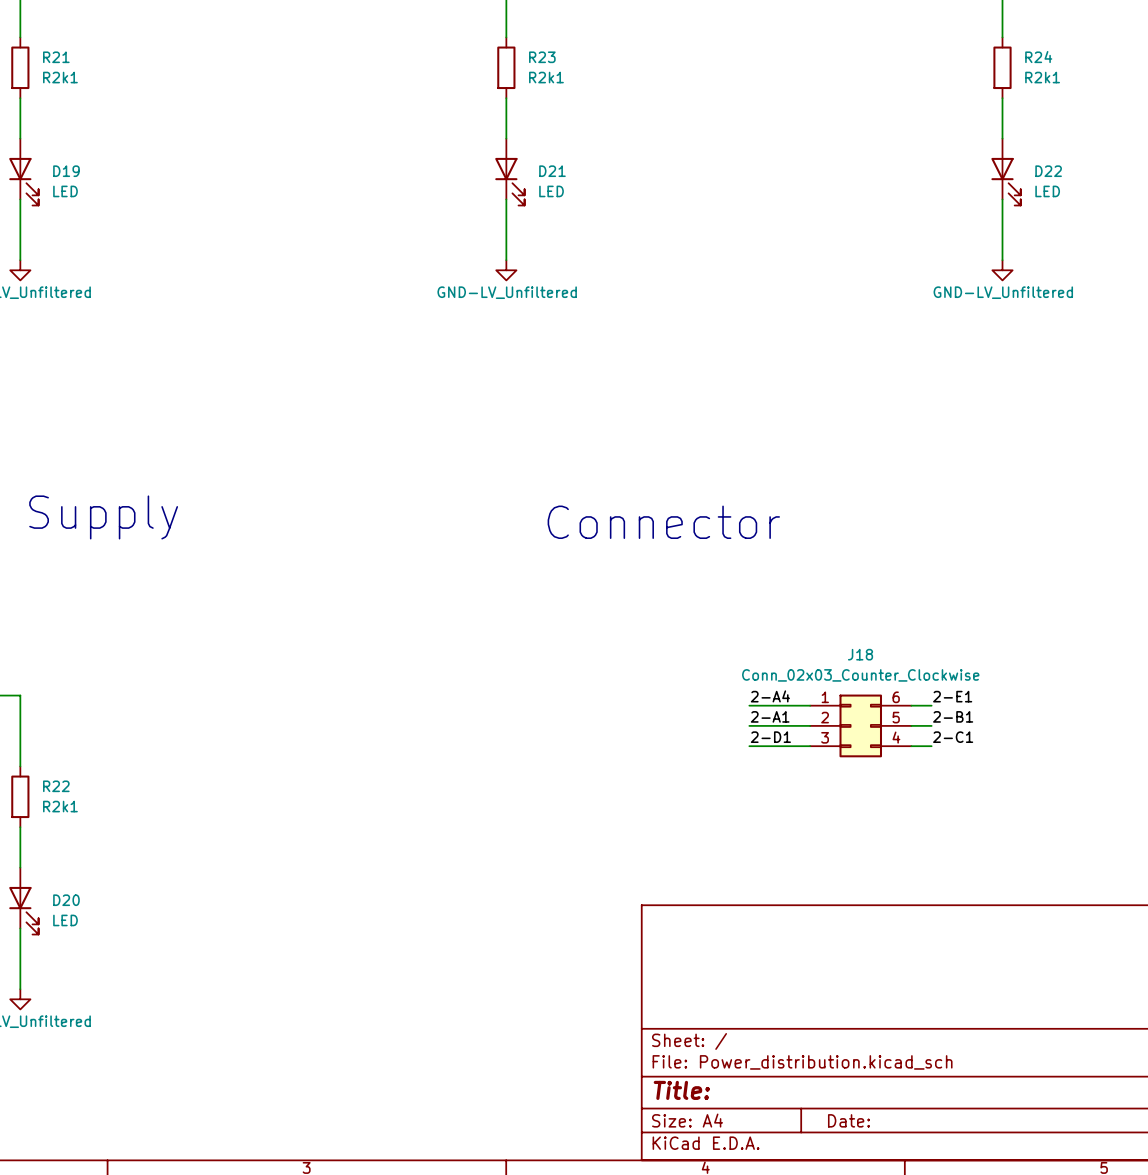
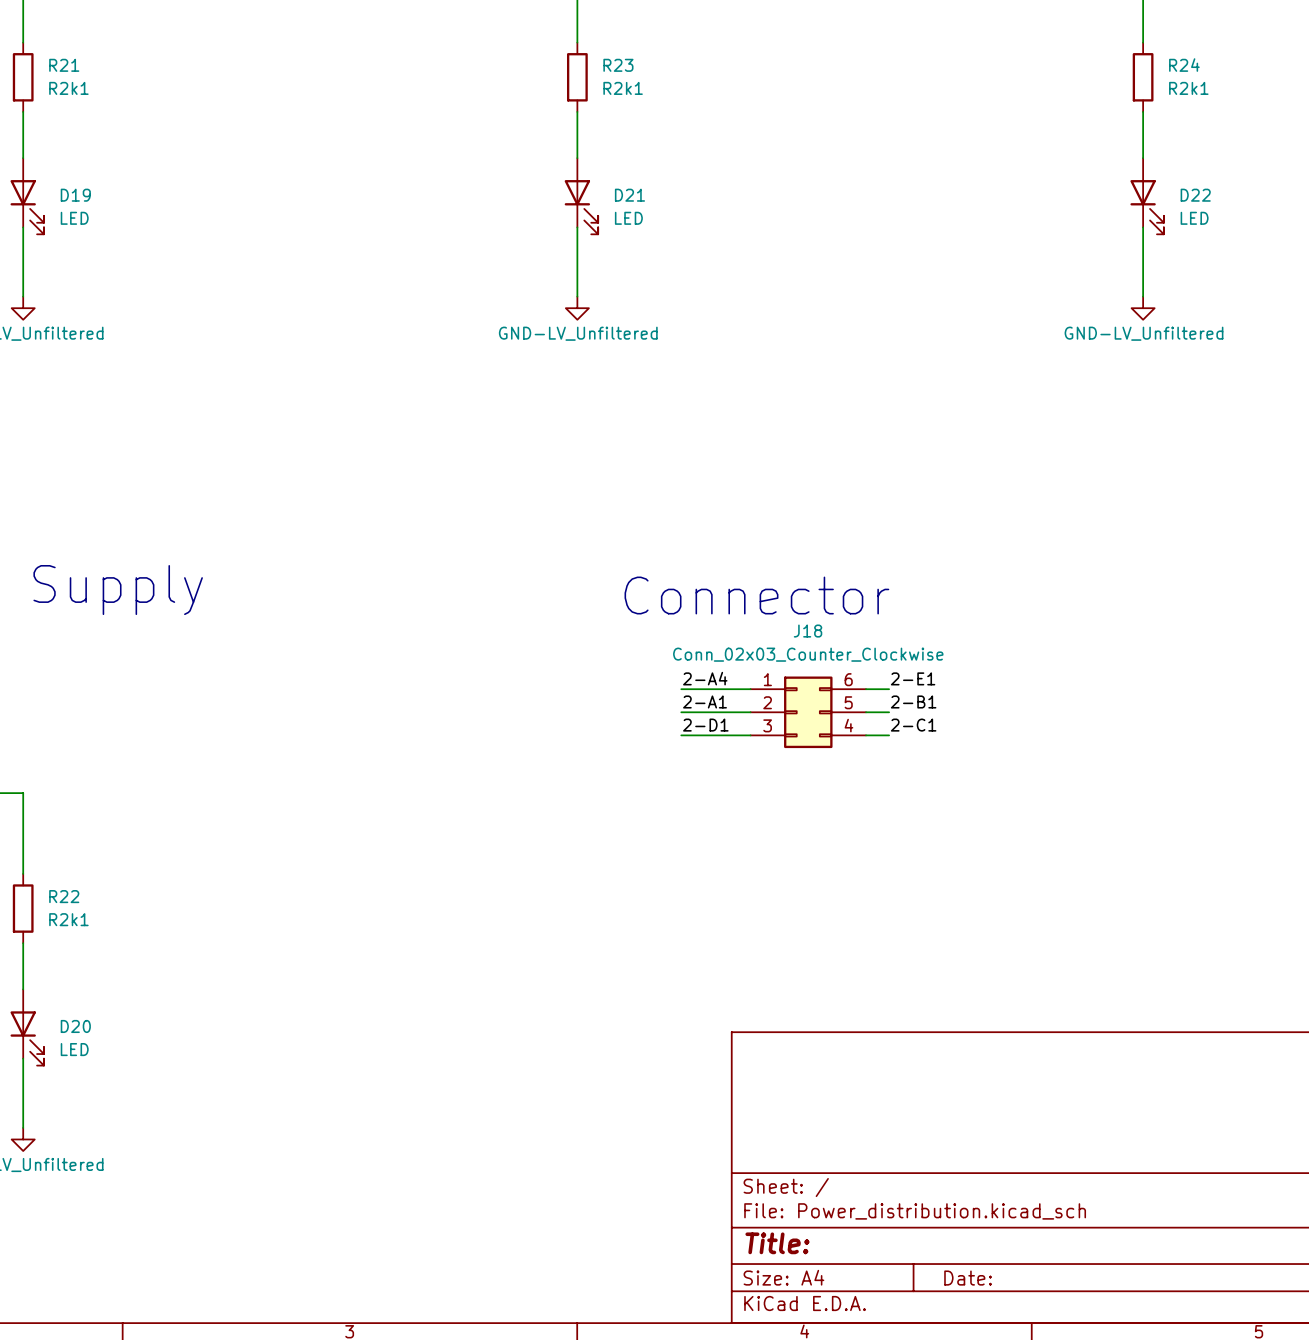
label position: 2-A4 (770, 696) -> 2-A4 (705, 678)
label position: 2-E1 (952, 696) -> 2-E1 (913, 678)
wire: (749, 705) (810, 705) -> (681, 689) (750, 689)
wire: (911, 705) (931, 705) -> (866, 689) (889, 689)
label position: 2-A1 (770, 716) -> 2-A1 (705, 701)
label position: 2-B1 (953, 716) -> 2-B1 (913, 701)
wire: (749, 725) (810, 725) -> (681, 712) (750, 712)
J18 position: (860, 725) -> (808, 712)
wire: (911, 725) (931, 725) -> (866, 712) (889, 712)
label position: 2-D1 (770, 737) -> 2-D1 (705, 725)
label position: 2-C1 (953, 737) -> 2-C1 (913, 725)
wire: (749, 746) (810, 746) -> (681, 735) (750, 735)
wire: (911, 746) (931, 746) -> (866, 735) (889, 735)

